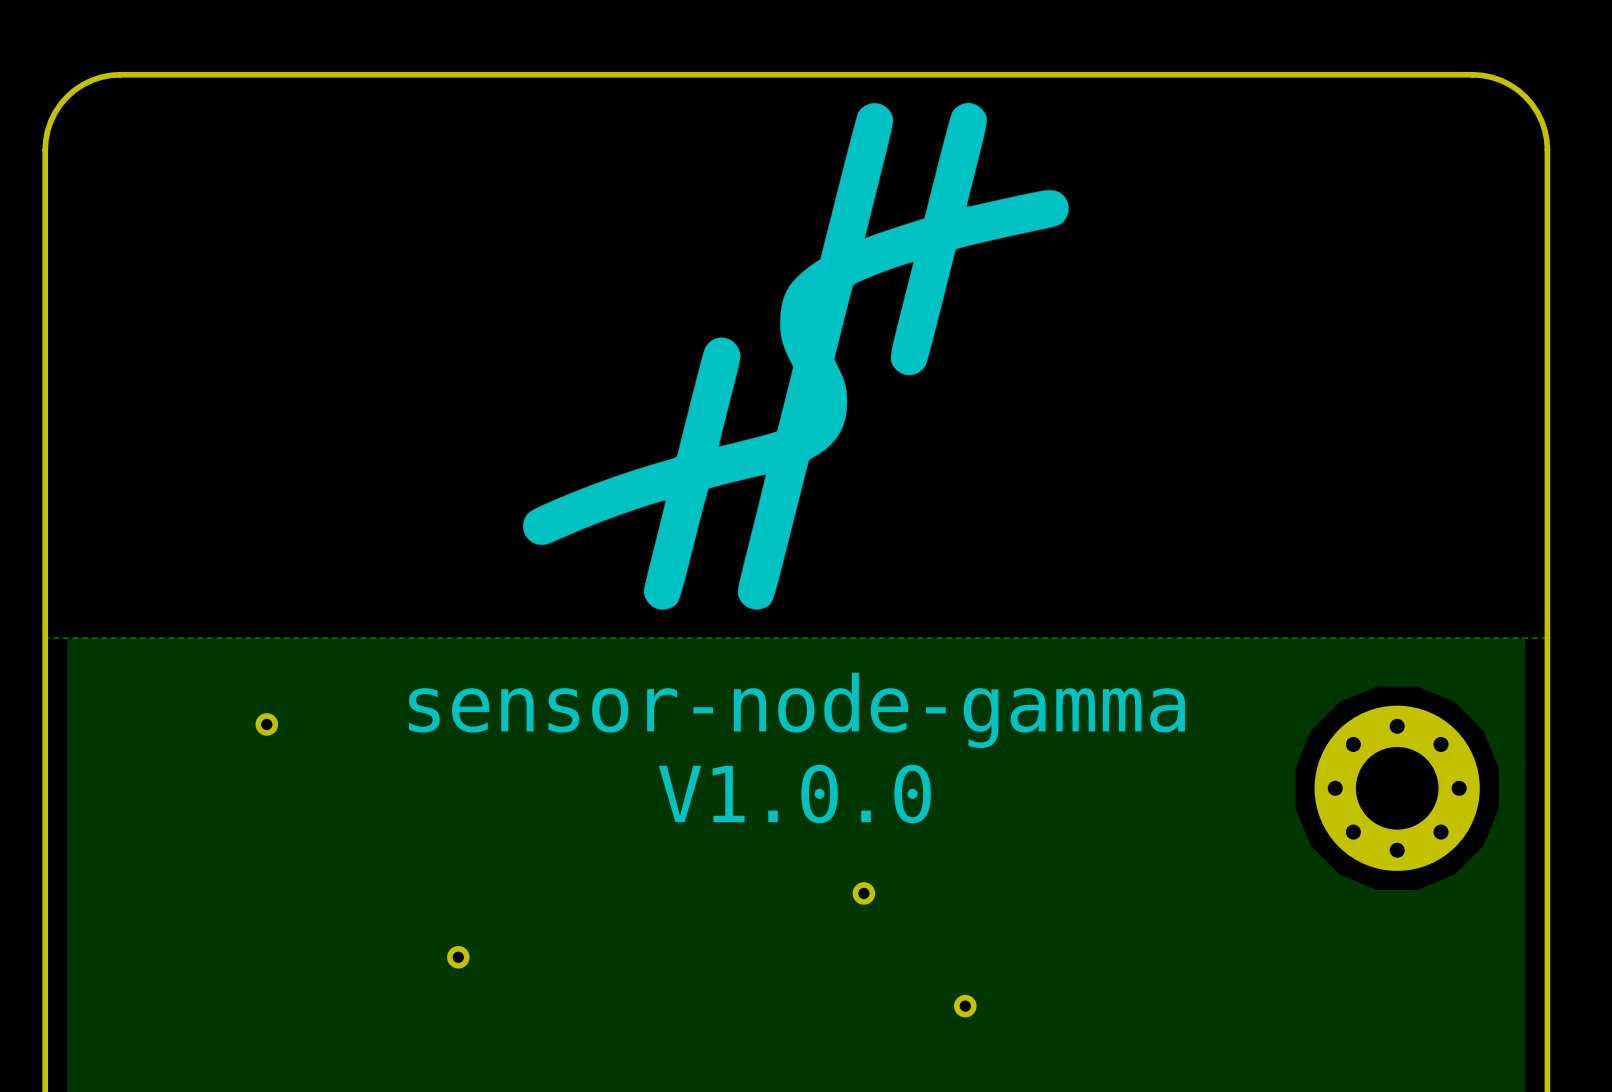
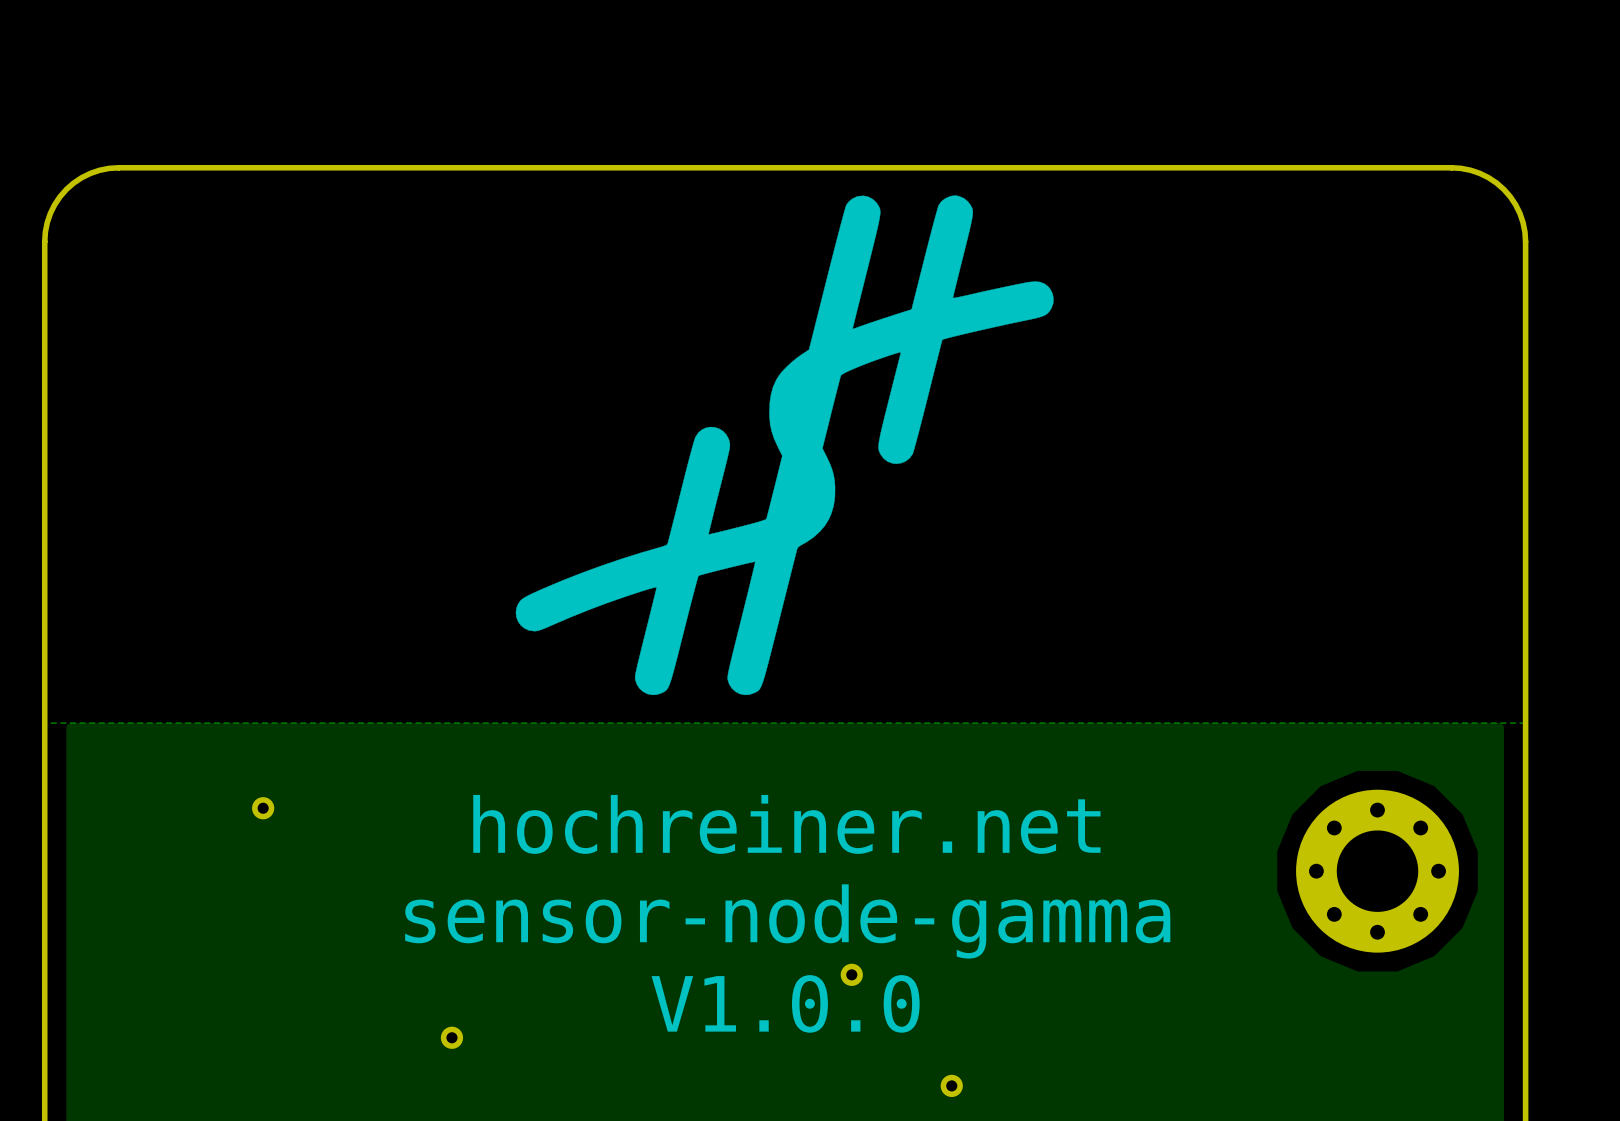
text position: sensor-node-gamma (797, 710) -> sensor-node-gamma (787, 921)
text: none -> hochreiner.net (786, 824)
text position: V1.0.0 (794, 794) -> V1.0.0 (785, 1003)

